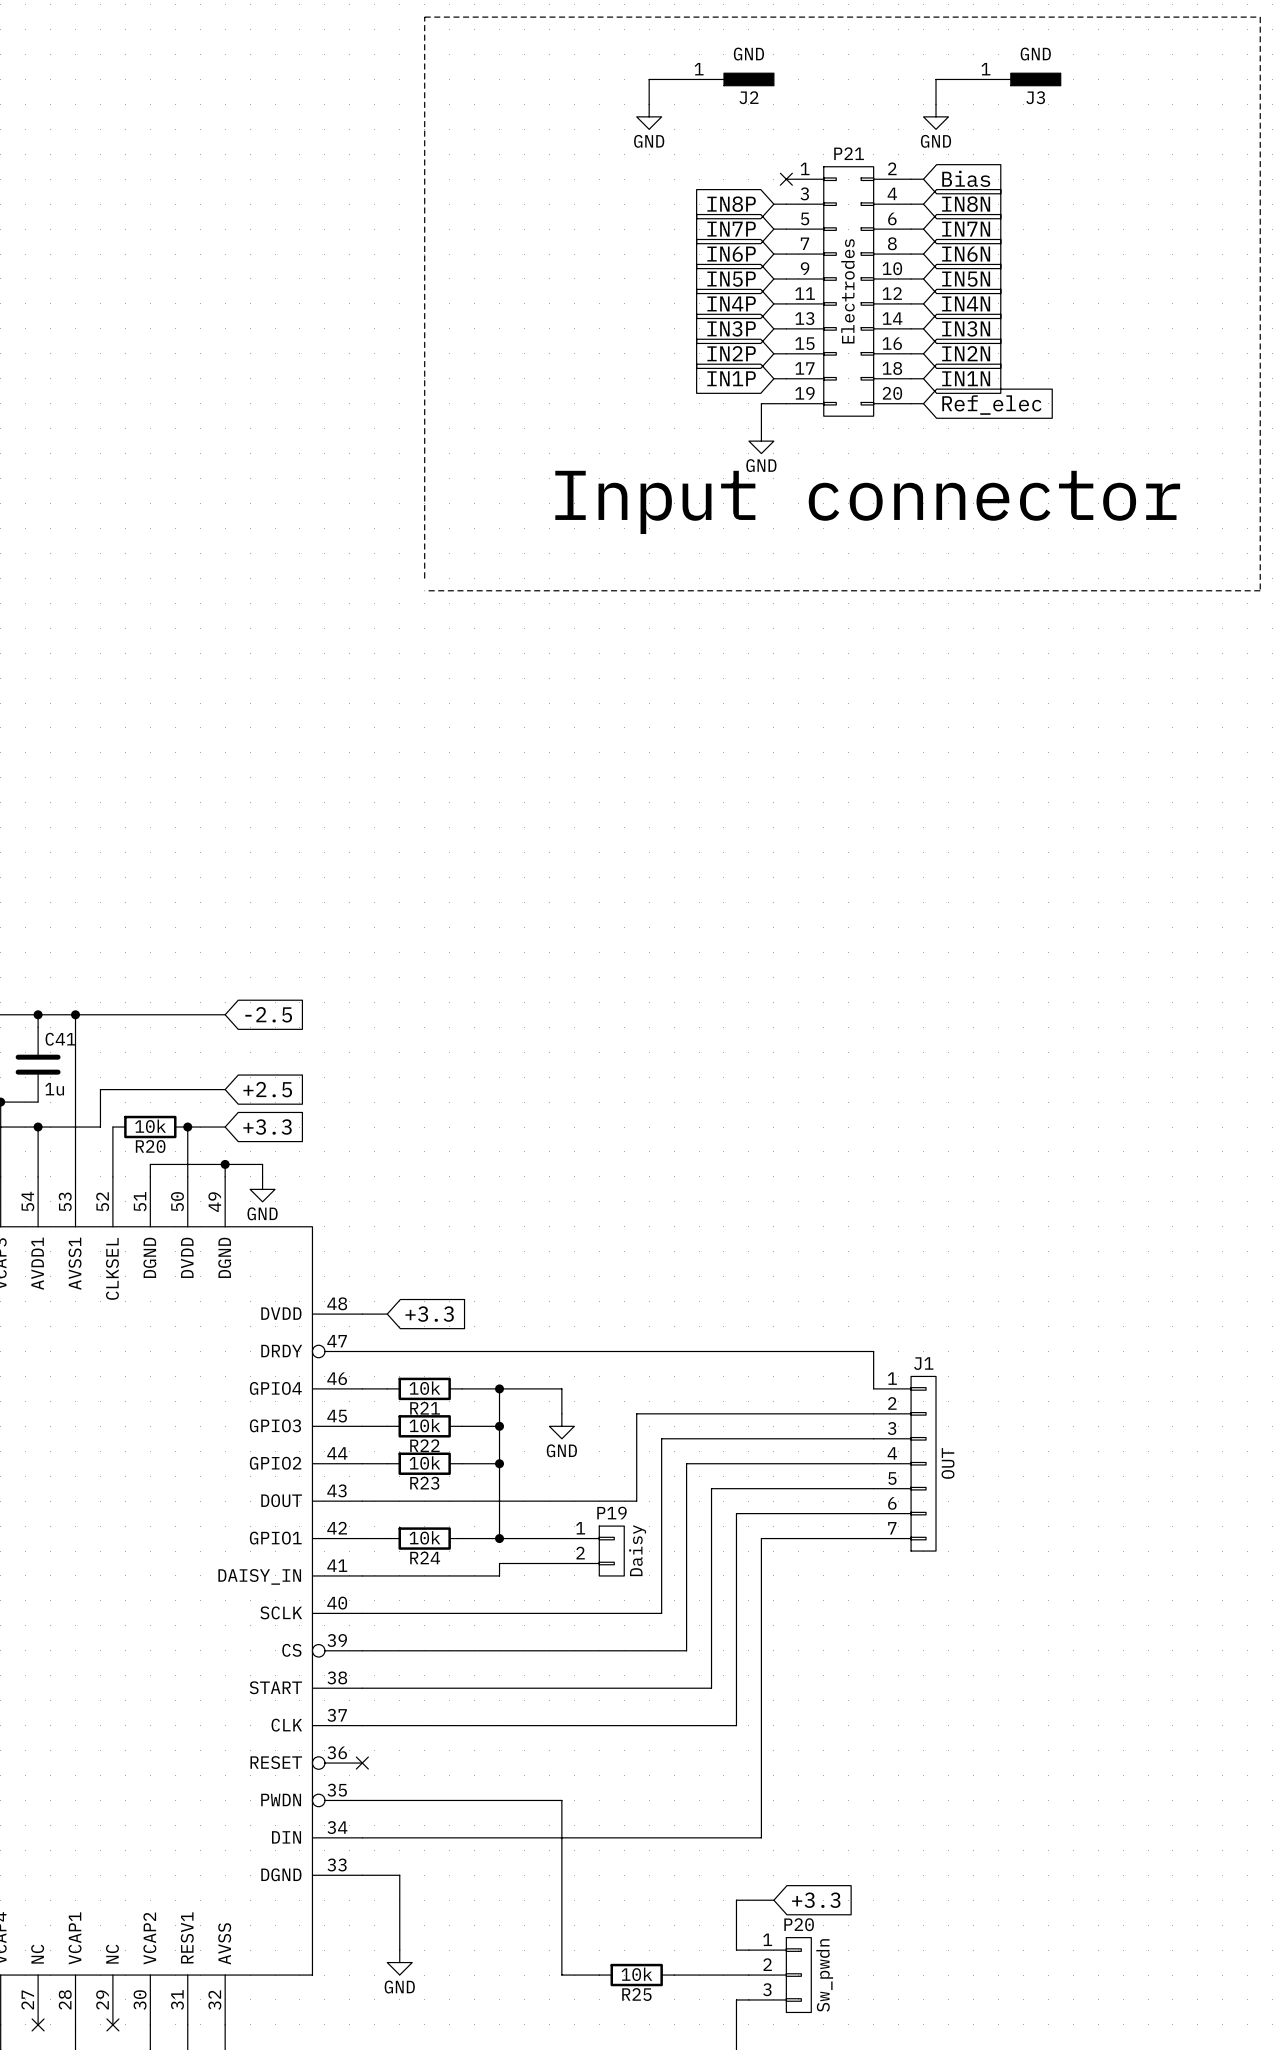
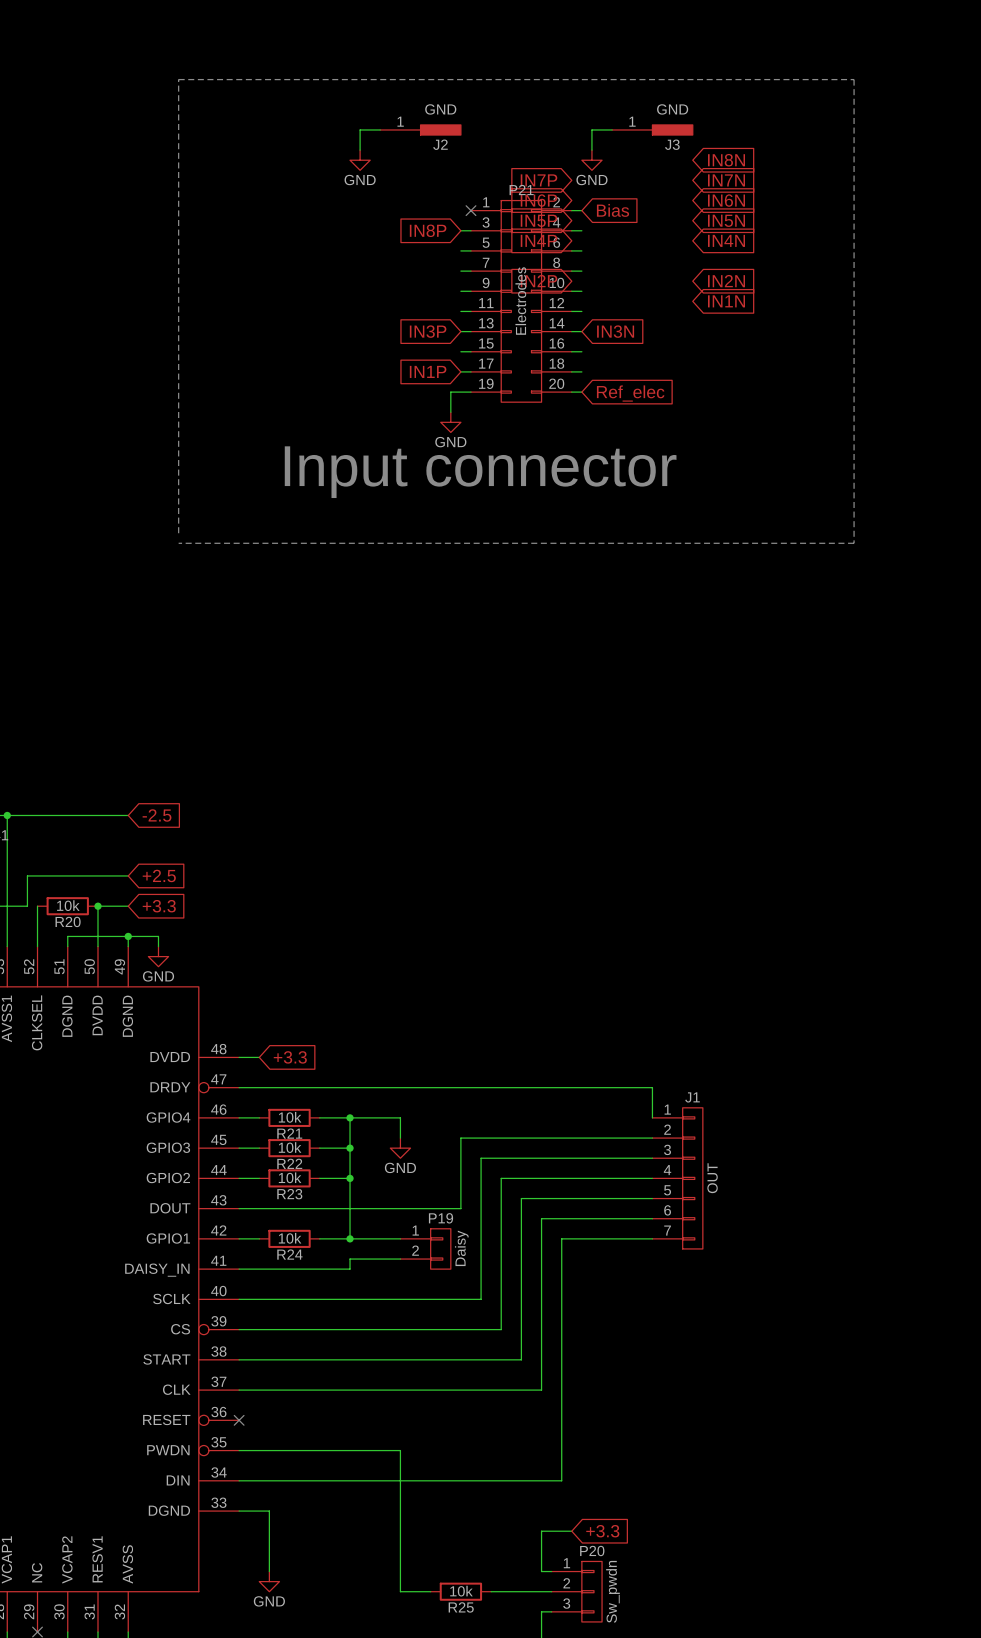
wire: (674, 79) (649, 79) (649, 104) -> (380, 129) (360, 129) (360, 150)
J2 position: (723, 79) -> (420, 129)
wire: (960, 79) (936, 79) (936, 104) -> (612, 129) (591, 129) (591, 150)
J3 position: (1010, 79) -> (652, 129)
power symbol: GND (649, 116) -> none
power symbol: GND (936, 116) -> none
global label position: Bias (966, 178) -> Bias (612, 210)
no-connect mark: (786, 179) -> none
wire: (911, 179) (923, 179) -> (571, 210) (581, 210)
power symbol: none -> GND (360, 160)
global label position: IN8P (731, 204) -> IN8P (428, 230)
wire: (773, 204) (786, 204) -> (460, 230) (470, 230)
power symbol: none -> GND (591, 160)
wire: (911, 204) (923, 204) -> (571, 230) (581, 230)
wire: (773, 229) (786, 229) -> (460, 250) (470, 250)
wire: (911, 229) (923, 229) -> (571, 250) (581, 250)
wire: (773, 254) (786, 254) -> (460, 271) (470, 271)
wire: (911, 254) (923, 254) -> (571, 271) (581, 271)
no-connect mark: none -> (470, 210)
wire: (773, 278) (786, 278) -> (460, 291) (470, 291)
wire: (911, 278) (923, 278) -> (571, 291) (581, 291)
P21 position: (848, 291) -> (521, 301)
wire: (773, 303) (786, 303) -> (460, 311) (470, 311)
wire: (911, 303) (923, 303) -> (571, 311) (581, 311)
global label position: IN3P (731, 328) -> IN3P (428, 331)
wire: (773, 328) (786, 328) -> (460, 331) (470, 331)
wire: (911, 328) (923, 328) -> (571, 331) (581, 331)
global label position: IN3N (966, 328) -> IN3N (615, 331)
wire: (773, 353) (786, 353) -> (460, 351) (470, 351)
wire: (911, 353) (923, 353) -> (571, 351) (581, 351)
global label position: IN1P (731, 378) -> IN1P (428, 371)
wire: (773, 378) (786, 378) -> (460, 371) (470, 371)
wire: (911, 378) (923, 378) -> (571, 371) (581, 371)
wire: (786, 403) (761, 403) (761, 428) -> (470, 392) (450, 392) (450, 412)
wire: (911, 403) (923, 403) -> (571, 392) (581, 392)
global label position: Ref_elec (991, 405) -> Ref_elec (630, 393)
power symbol: GND (761, 441) -> none
text position: Input connector (867, 502) -> Input connector (480, 472)
power symbol: none -> GND (450, 422)
line: (424, 578) (424, 17) (1260, 17) (1260, 590) (424, 590) -> (178, 533) (178, 79) (854, 79) (854, 543) (178, 543)

